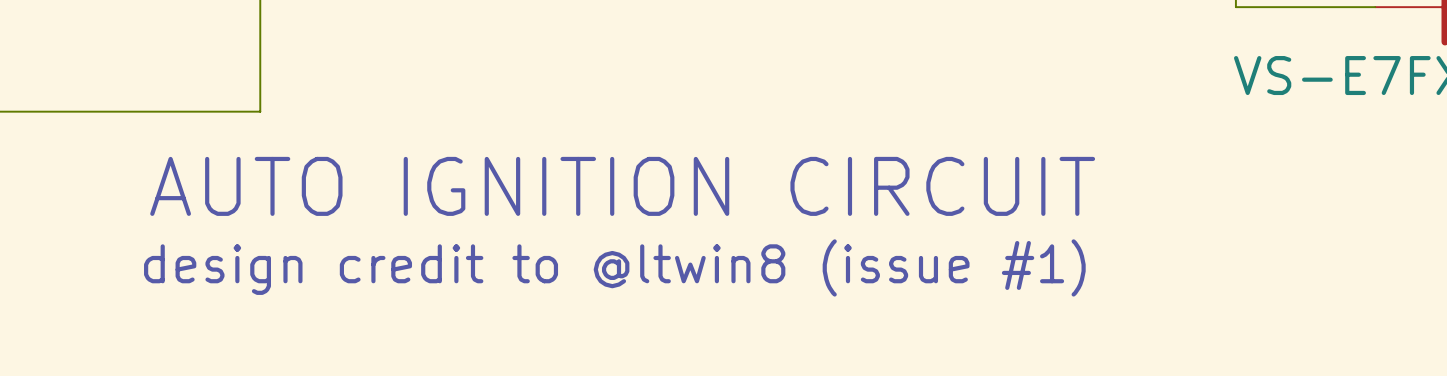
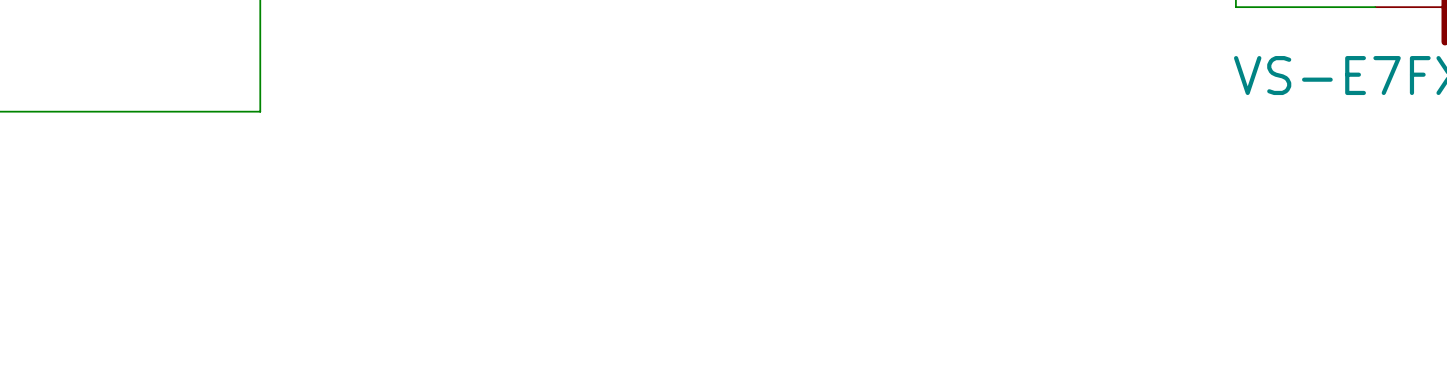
text: AUTO IGNITION CIRCUIT (622, 186) -> none
text: design credit to @ltwin8 (issue #1) (614, 267) -> none

